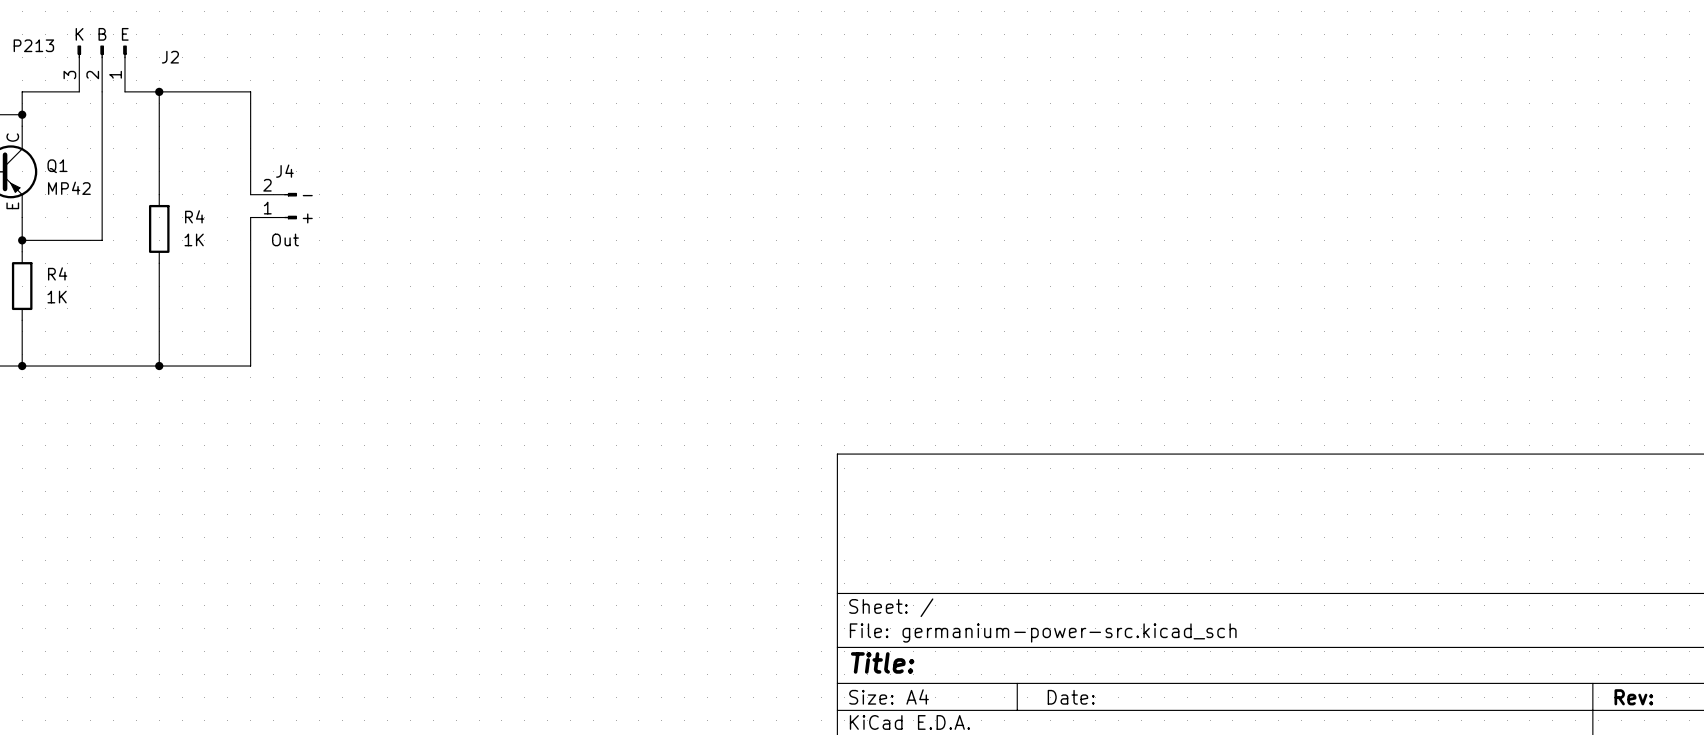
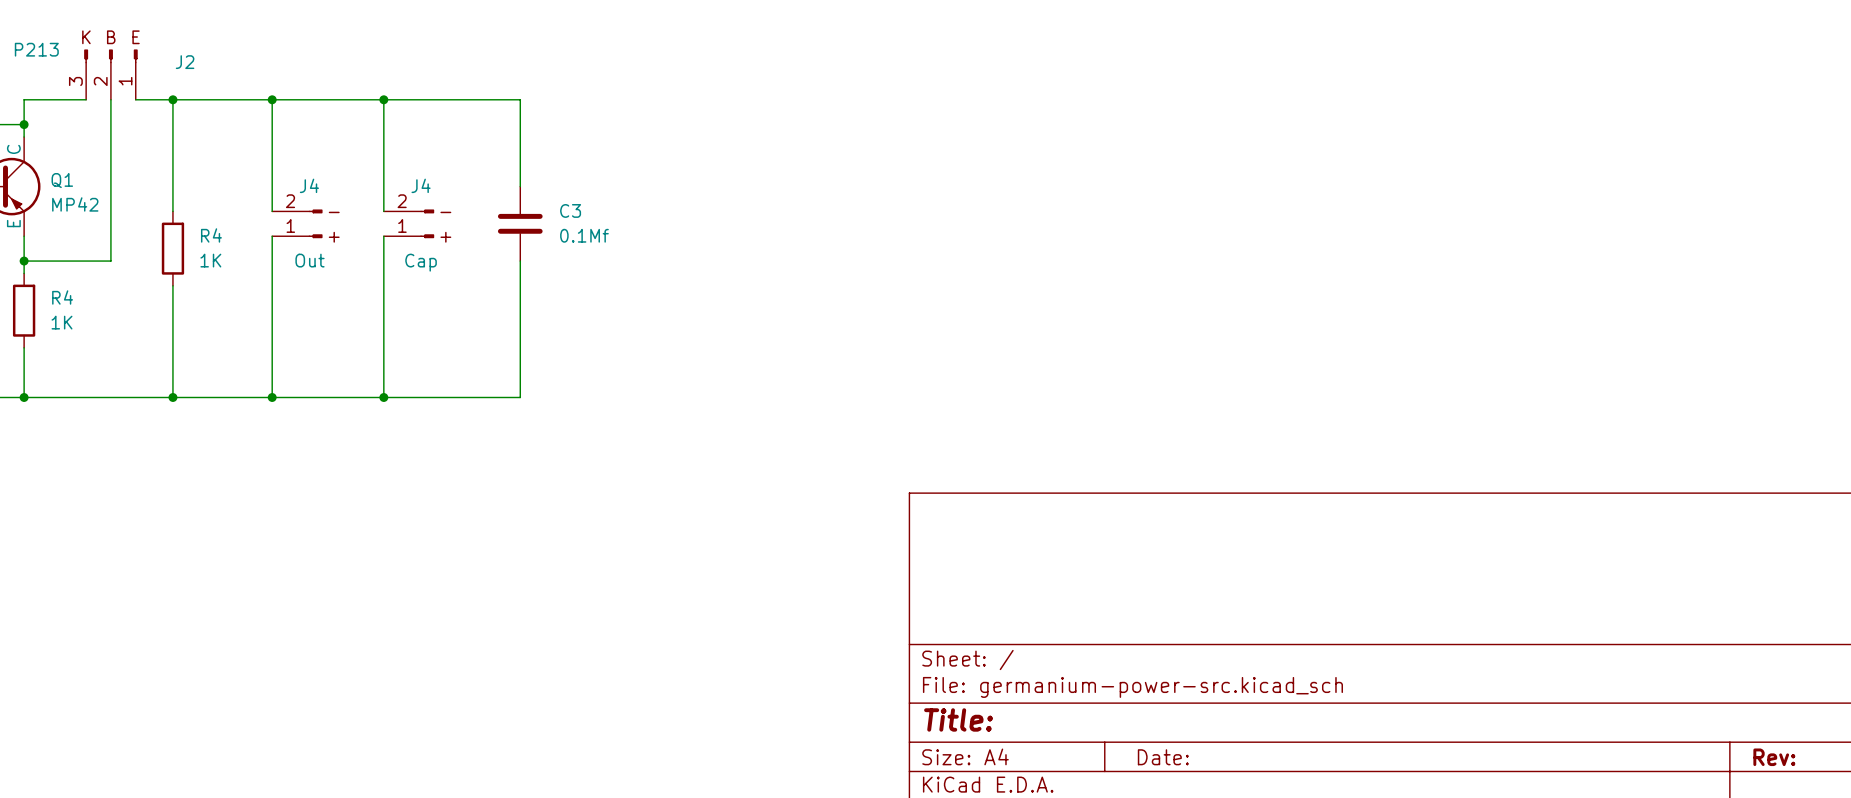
wire: none -> (272, 99) (520, 99) (520, 186)
junction: none -> (272, 99)
wire: none -> (383, 99) (383, 211)
junction: none -> (383, 99)
J4: none -> Cap (409, 223)
C3: none -> 0.1Mf (520, 223)
wire: none -> (383, 236) (383, 397)
wire: none -> (520, 261) (520, 397) (272, 397)
junction: none -> (272, 397)
junction: none -> (383, 397)

